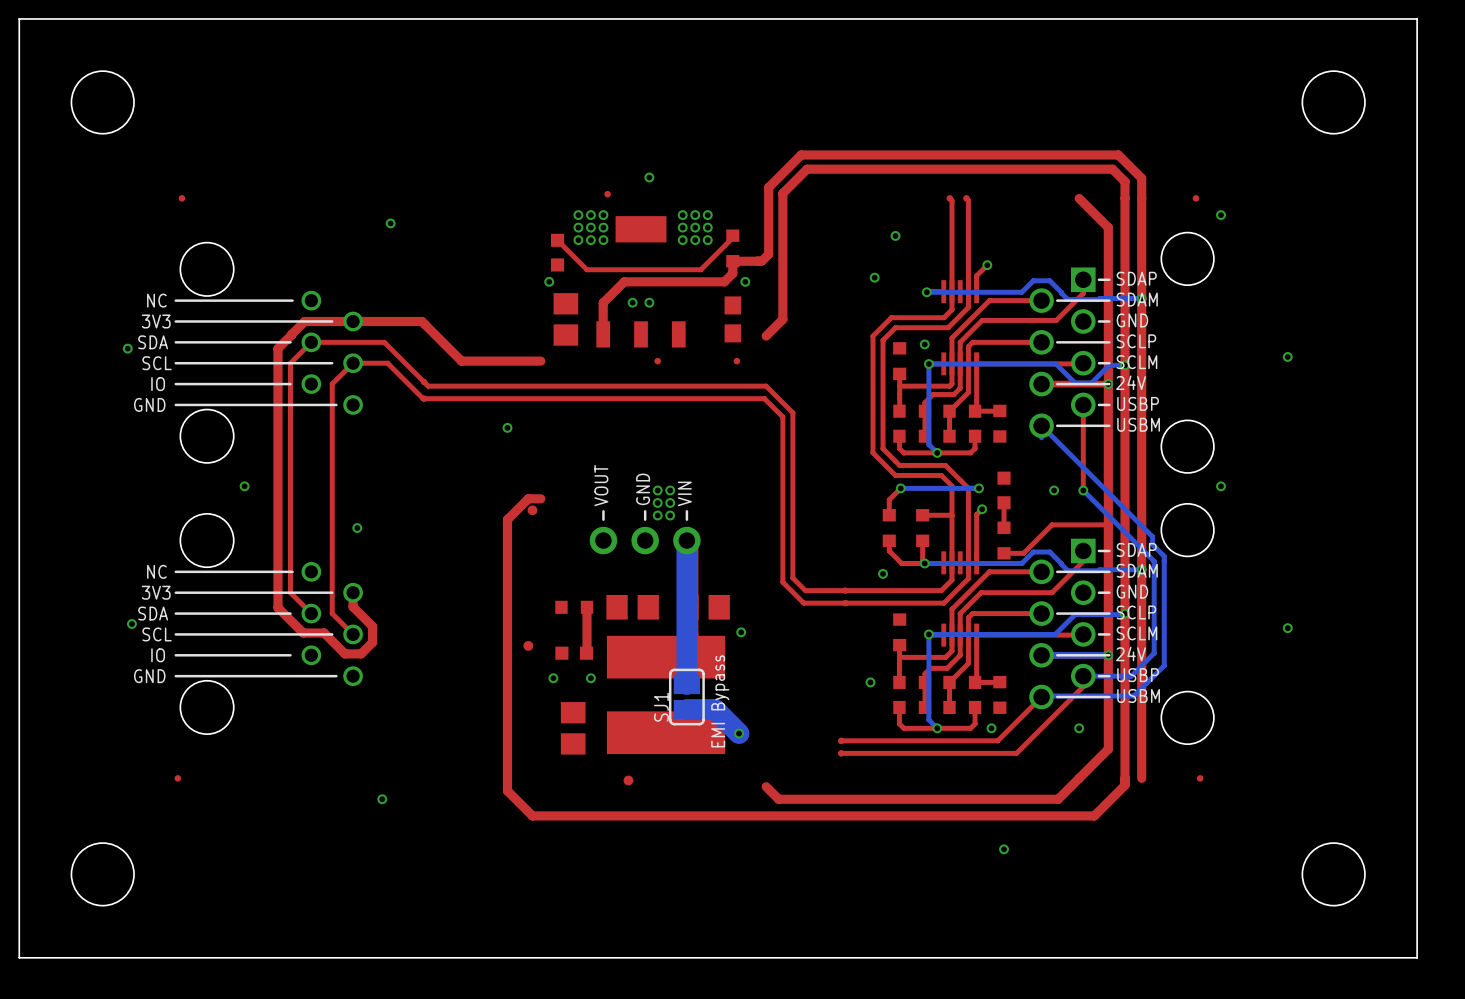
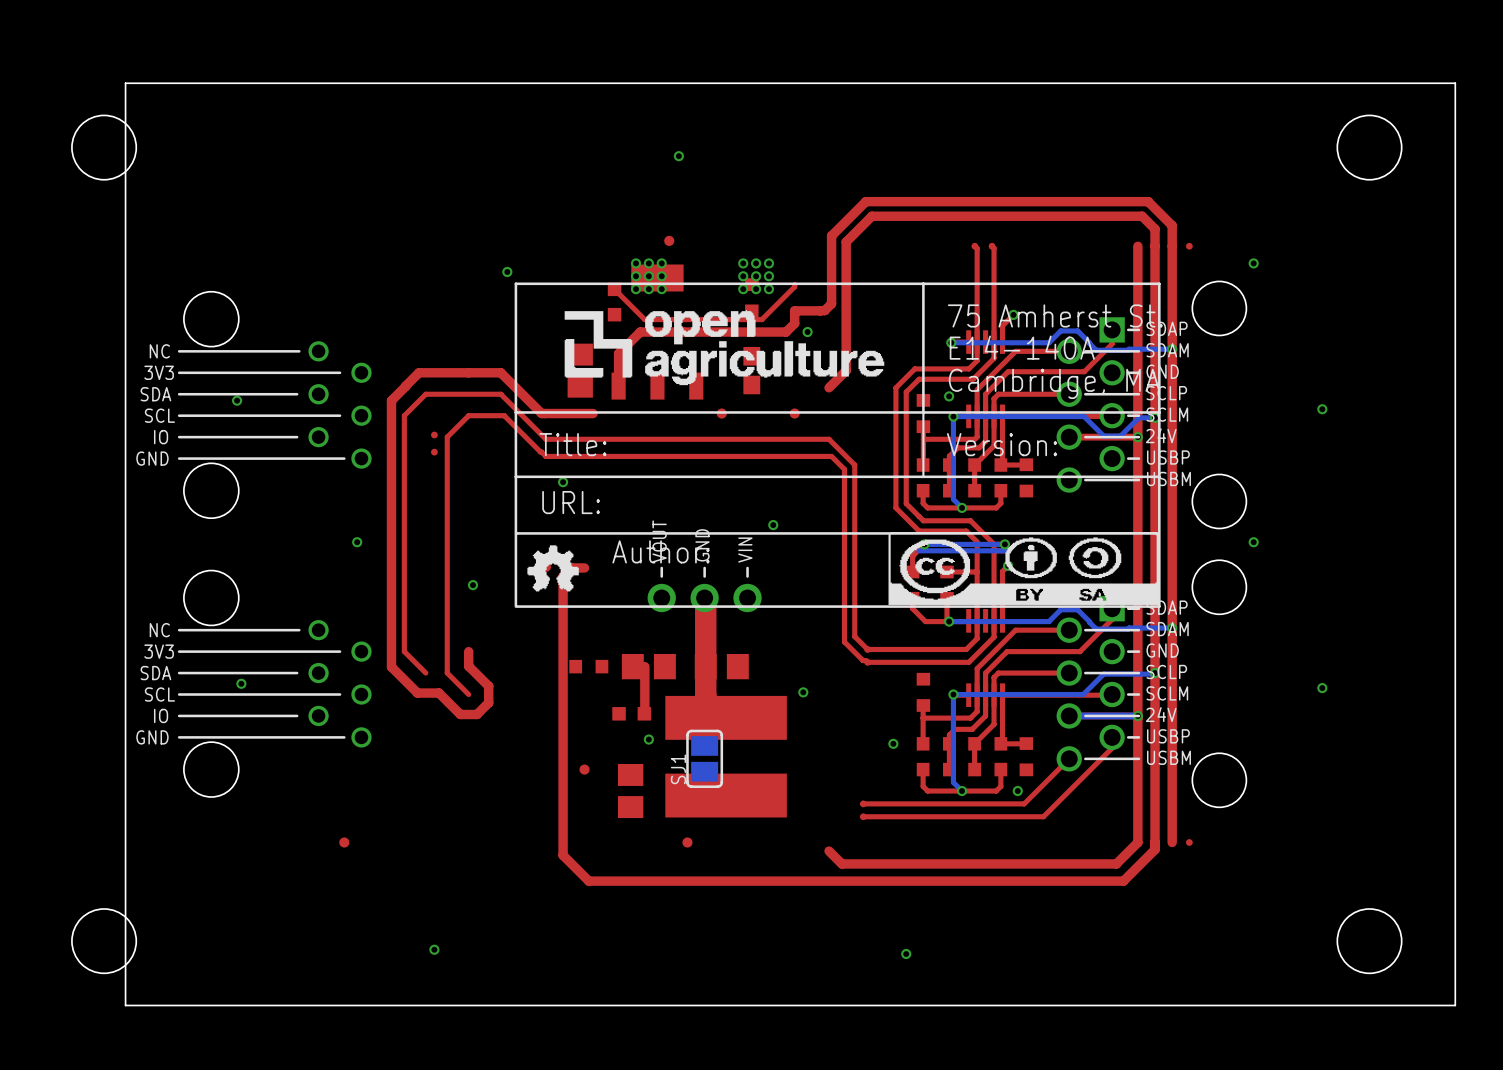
board edge: (1417, 39) (1417, 18) (19, 18) (19, 957) (1417, 957) (1417, 936) -> (1455, 83) (125, 83) (125, 1005) (1455, 1005)
via: none -> (678, 156)
top track: (843, 155) (801, 155) (768, 187) (768, 254) (762, 260) (757, 260) -> (865, 201) (831, 235) (831, 303) (824, 310) (794, 310) (794, 323) (786, 332) (743, 332)
top track: (849, 169) (807, 169) (782, 193) (782, 319) (766, 336) -> (871, 216) (846, 241) (846, 370) (829, 387)
via: (649, 177) -> none
part: none -> (669, 240)
part: (607, 194) -> none
part: (182, 198) -> none
top track: (1079, 198) (1108, 227) -> (1137, 246) (1137, 276)
part position: (1195, 198) -> (1189, 246)
via: (578, 215) -> none
via: (590, 215) -> none
via: (603, 215) -> none
via: none -> (636, 263)
via: none -> (648, 263)
via: none -> (661, 263)
via: (682, 215) -> none
via: (695, 215) -> none
via: (707, 215) -> none
via: none -> (743, 263)
via: none -> (756, 263)
via: none -> (768, 263)
via: (390, 223) -> none
via: none -> (507, 271)
via: (578, 227) -> none
via: (590, 227) -> none
via: (603, 227) -> none
via: none -> (636, 276)
via: none -> (648, 276)
via: none -> (661, 276)
via: (682, 227) -> none
via: (695, 227) -> none
via: (707, 227) -> none
via: none -> (743, 276)
via: none -> (756, 276)
via: none -> (768, 276)
drawing: none -> [514, 282, 1161, 608]
top track: (732, 235) (700, 269) -> (794, 284) (794, 286) (761, 319) (719, 319)
via: (895, 235) -> none
top track: (557, 240) (586, 269) (628, 269) -> (614, 289) (644, 319)
via: (578, 240) -> none
via: (590, 240) -> none
via: (603, 240) -> none
via: none -> (636, 289)
via: none -> (648, 289)
via: none -> (661, 289)
via: (682, 240) -> none
via: (695, 240) -> none
via: (707, 240) -> none
via: none -> (743, 289)
via: none -> (756, 289)
via: none -> (768, 289)
part position: (557, 252) -> (614, 302)
top track: (757, 261) (732, 261) (732, 273) (724, 281) -> none
via: (874, 277) -> none
via: (549, 281) -> none
via: (745, 281) -> none
via: none -> (807, 332)
via: (632, 302) -> none
via: (649, 302) -> none
top track: (409, 321) (304, 321) (277, 348) (277, 607) (303, 633) (324, 633) (345, 653) (361, 653) (372, 642) (372, 626) (353, 606) (353, 592) -> (418, 372) (391, 400) (391, 667) (417, 693) (438, 693) (460, 714) (476, 714) (488, 702) (488, 686) (468, 666) (468, 651)
top track: (421, 321) (461, 361) (528, 361) -> (432, 372) (500, 372) (541, 413)
via: (127, 348) -> none
via: none -> (237, 400)
top track: none -> (593, 413) (554, 413)
part: (657, 361) -> none
part: none -> (721, 413)
part: (736, 361) -> none
part: none -> (794, 413)
top track: (532, 386) (428, 386) (384, 342) (311, 342) (290, 363) (290, 592) (311, 613) -> (545, 439) (500, 394) (425, 394) (404, 415) (404, 651) (425, 673)
top track: (766, 386) (792, 412) (792, 578) (805, 590) (845, 590) -> (786, 439) (829, 439) (854, 465) (854, 636) (867, 649)
top track: (527, 398) (423, 398) (387, 363) (353, 363) (332, 384) (332, 613) (353, 634) -> (540, 452) (504, 415) (468, 415) (447, 437) (447, 673) (468, 694)
top track: (528, 398) (764, 398) (782, 417) (782, 582) (803, 603) (845, 603) -> (541, 452) (545, 456) (831, 456) (844, 469) (844, 642) (863, 660) (867, 662)
top track: (1083, 404) (1083, 490) -> none
via position: (507, 427) -> (563, 482)
bottom track: (1041, 437) (1041, 425) (1152, 536) (1152, 544) (1164, 556) (1164, 665) (1133, 695) (1041, 697) -> none
via: none -> (773, 525)
via: (244, 486) -> none
via: (657, 490) -> none
via: (670, 490) -> none
part: (1004, 490) -> none
via: (1054, 490) -> none
bottom track: (1083, 490) (1154, 561) (1154, 653) (1131, 676) (1083, 676) -> none
via: (1083, 490) -> none
bottom track: none -> (1009, 550) (919, 550)
top track: (540, 498) (528, 498) (507, 519) (507, 790) (532, 815) (574, 815) -> (584, 567) (571, 567) (563, 576) (563, 855) (588, 881)
via: (657, 502) -> none
via: (670, 502) -> none
top track: (1004, 502) (1004, 527) -> none
via: (657, 515) -> none
via: (670, 515) -> none
top track: (1108, 524) (1052, 524) (1023, 553) (1004, 553) -> none
via position: (357, 528) -> (357, 542)
via: none -> (473, 585)
part position: (645, 532) -> (704, 589)
bottom track: (686, 540) (686, 684) -> none
part: (1004, 540) -> none
via: (883, 573) -> none
top track: (587, 607) (586, 653) -> (644, 666) (644, 713)
via: (131, 624) -> none
via: none -> (241, 683)
via position: (741, 632) -> (803, 692)
part: (528, 645) -> none
part position: (574, 653) -> (631, 713)
via: (553, 678) -> none
via: (590, 678) -> none
via: none -> (648, 739)
part position: (666, 694) -> (726, 756)
text: EMI Bypass (720, 701) -> none
part: none -> (584, 769)
bottom track: (686, 709) (715, 709) (739, 733) -> none
part position: (573, 728) -> (630, 791)
via: (1079, 728) -> none
via: (739, 733) -> none
top track: (1108, 749) (1058, 799) -> (1137, 812) (1137, 842) (1116, 863) (1086, 863)
part: (177, 778) -> none
part: none -> (344, 842)
part: none -> (1189, 842)
part: (1200, 778) -> none
part position: (628, 780) -> (687, 842)
top track: (766, 786) (778, 799) (820, 799) -> (829, 851) (841, 863)
via position: (382, 799) -> (434, 949)
via: (1004, 849) -> none
via: none -> (906, 954)

